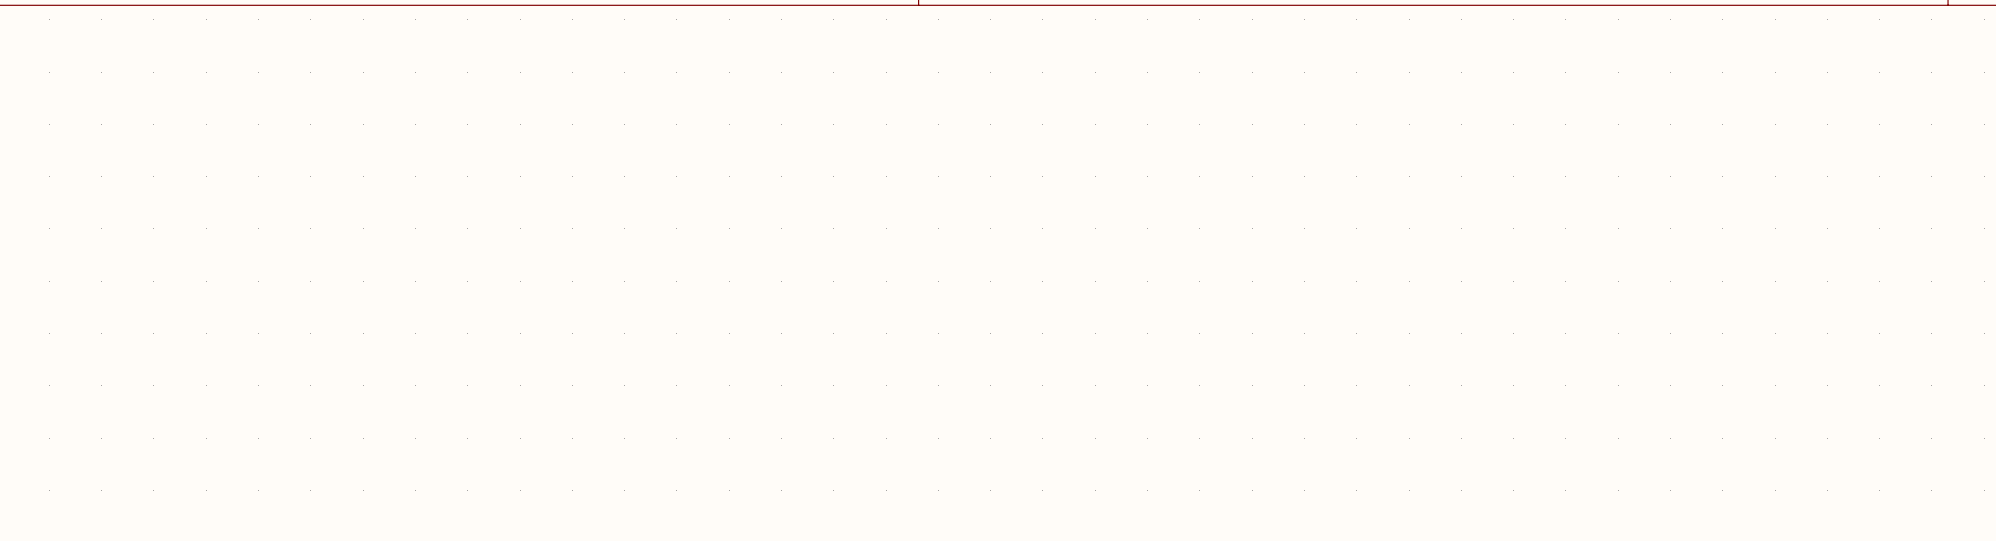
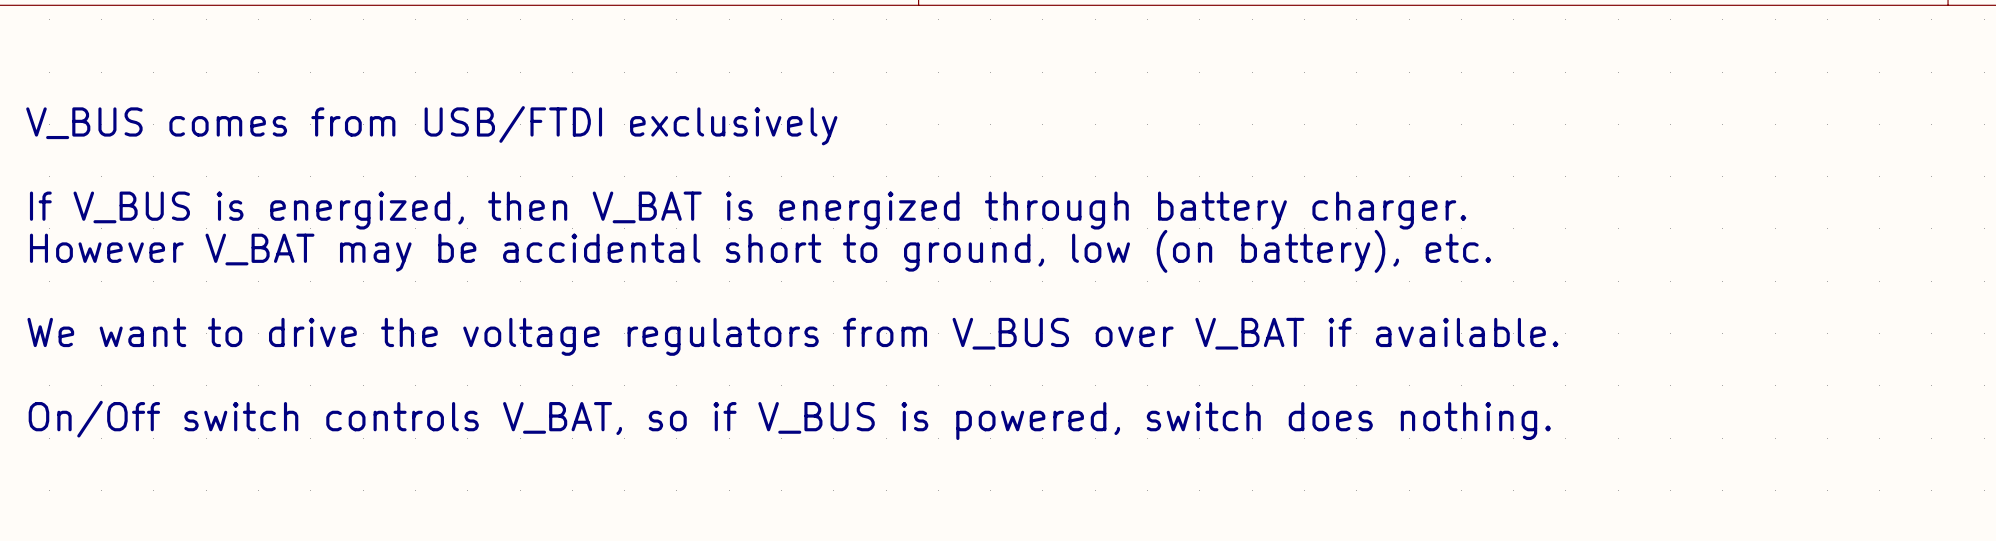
text: none -> V_BUS comes from USB/FTDI exclusively (431, 125)
text: none -> If V_BUS is energized, then V_BAT is energized through battery charger. (748, 210)
text: none -> However V_BAT may be accidental short to ground, low (on battery), etc. (760, 251)
text: none -> We want to drive the voltage regulators from V_BUS over V_BAT if available. (792, 336)
text: none -> On/Off switch controls V_BAT, so if V_BUS is powered, switch does nothing. (789, 420)

